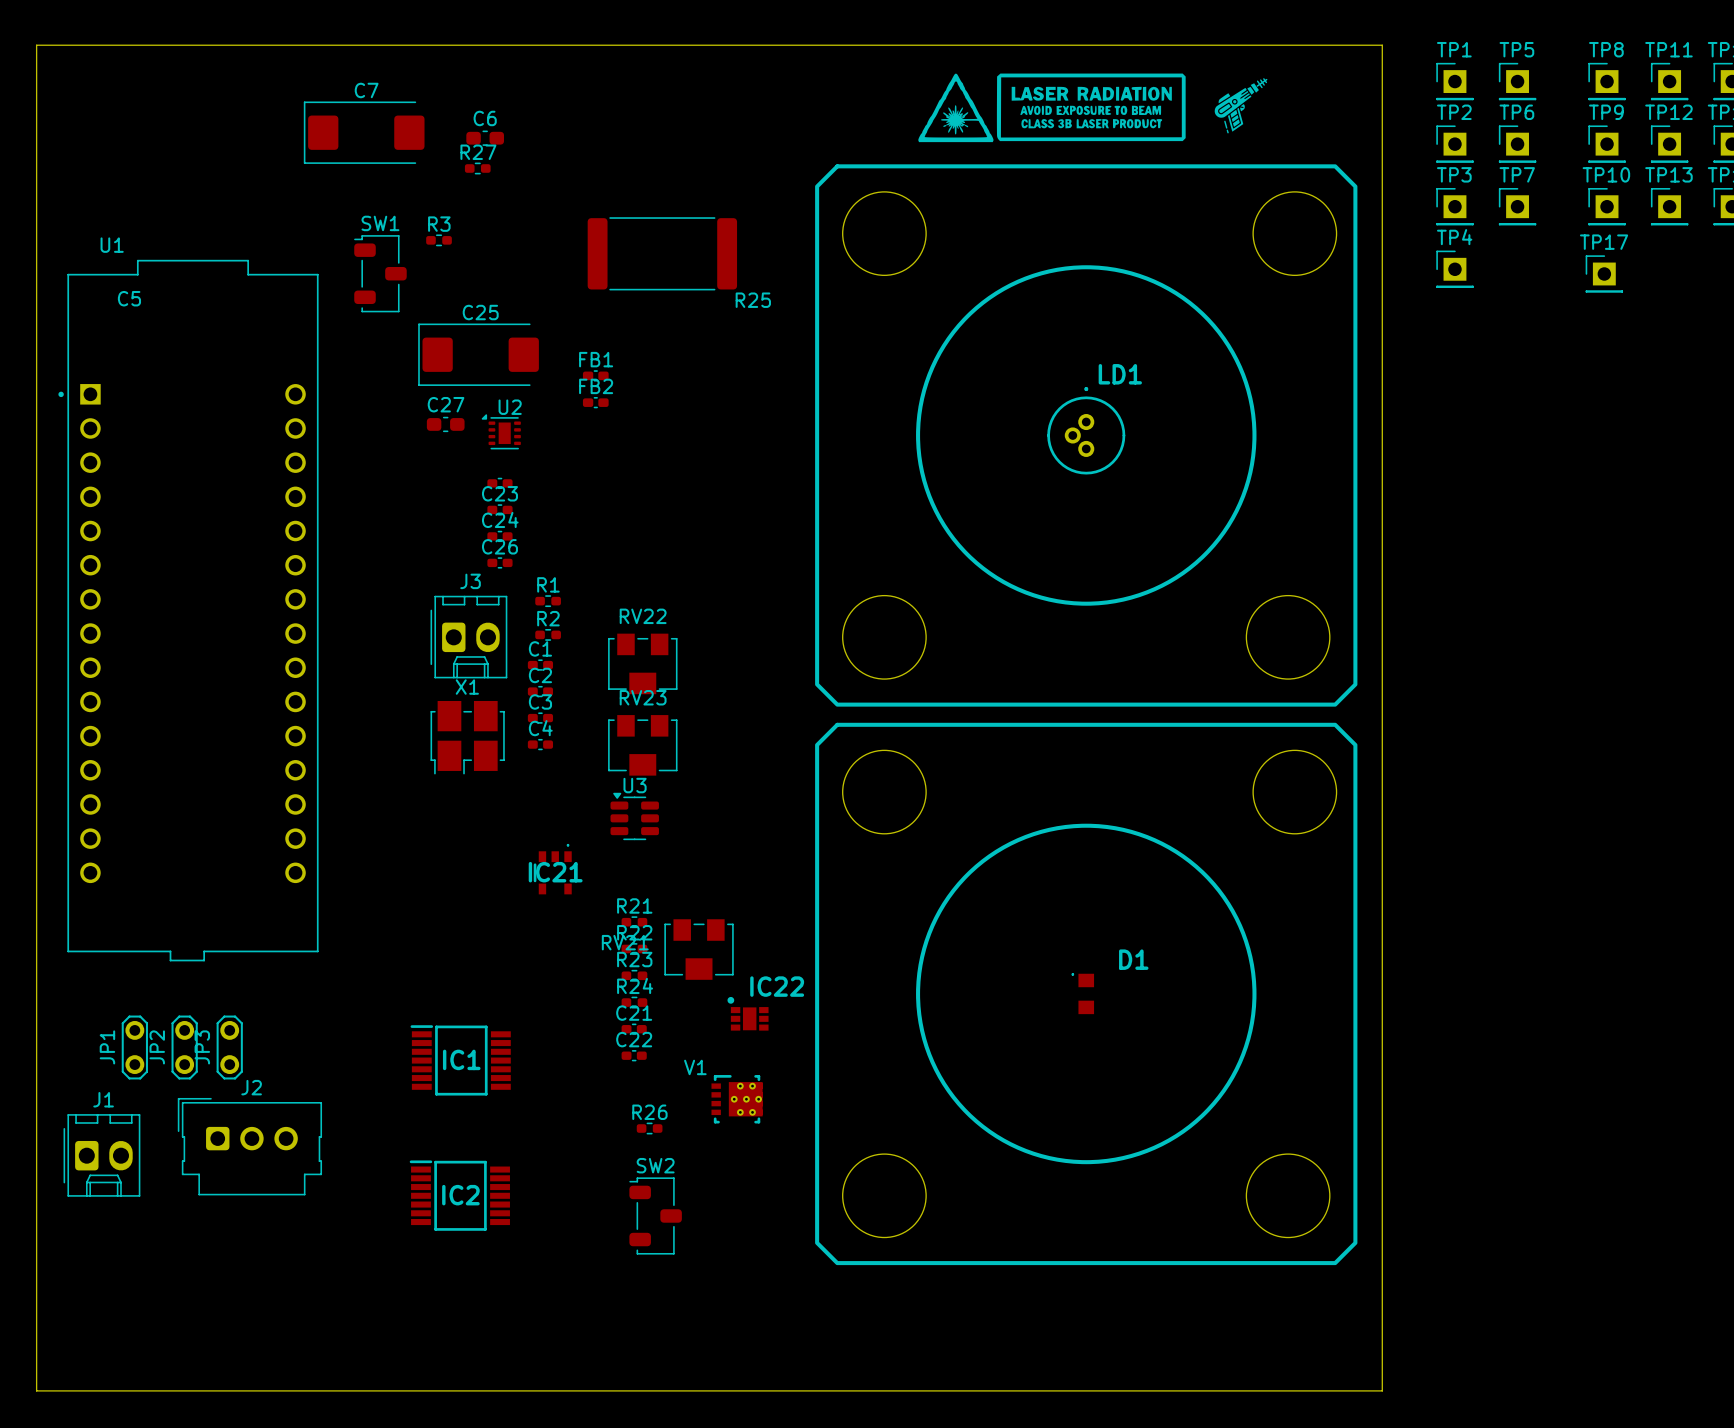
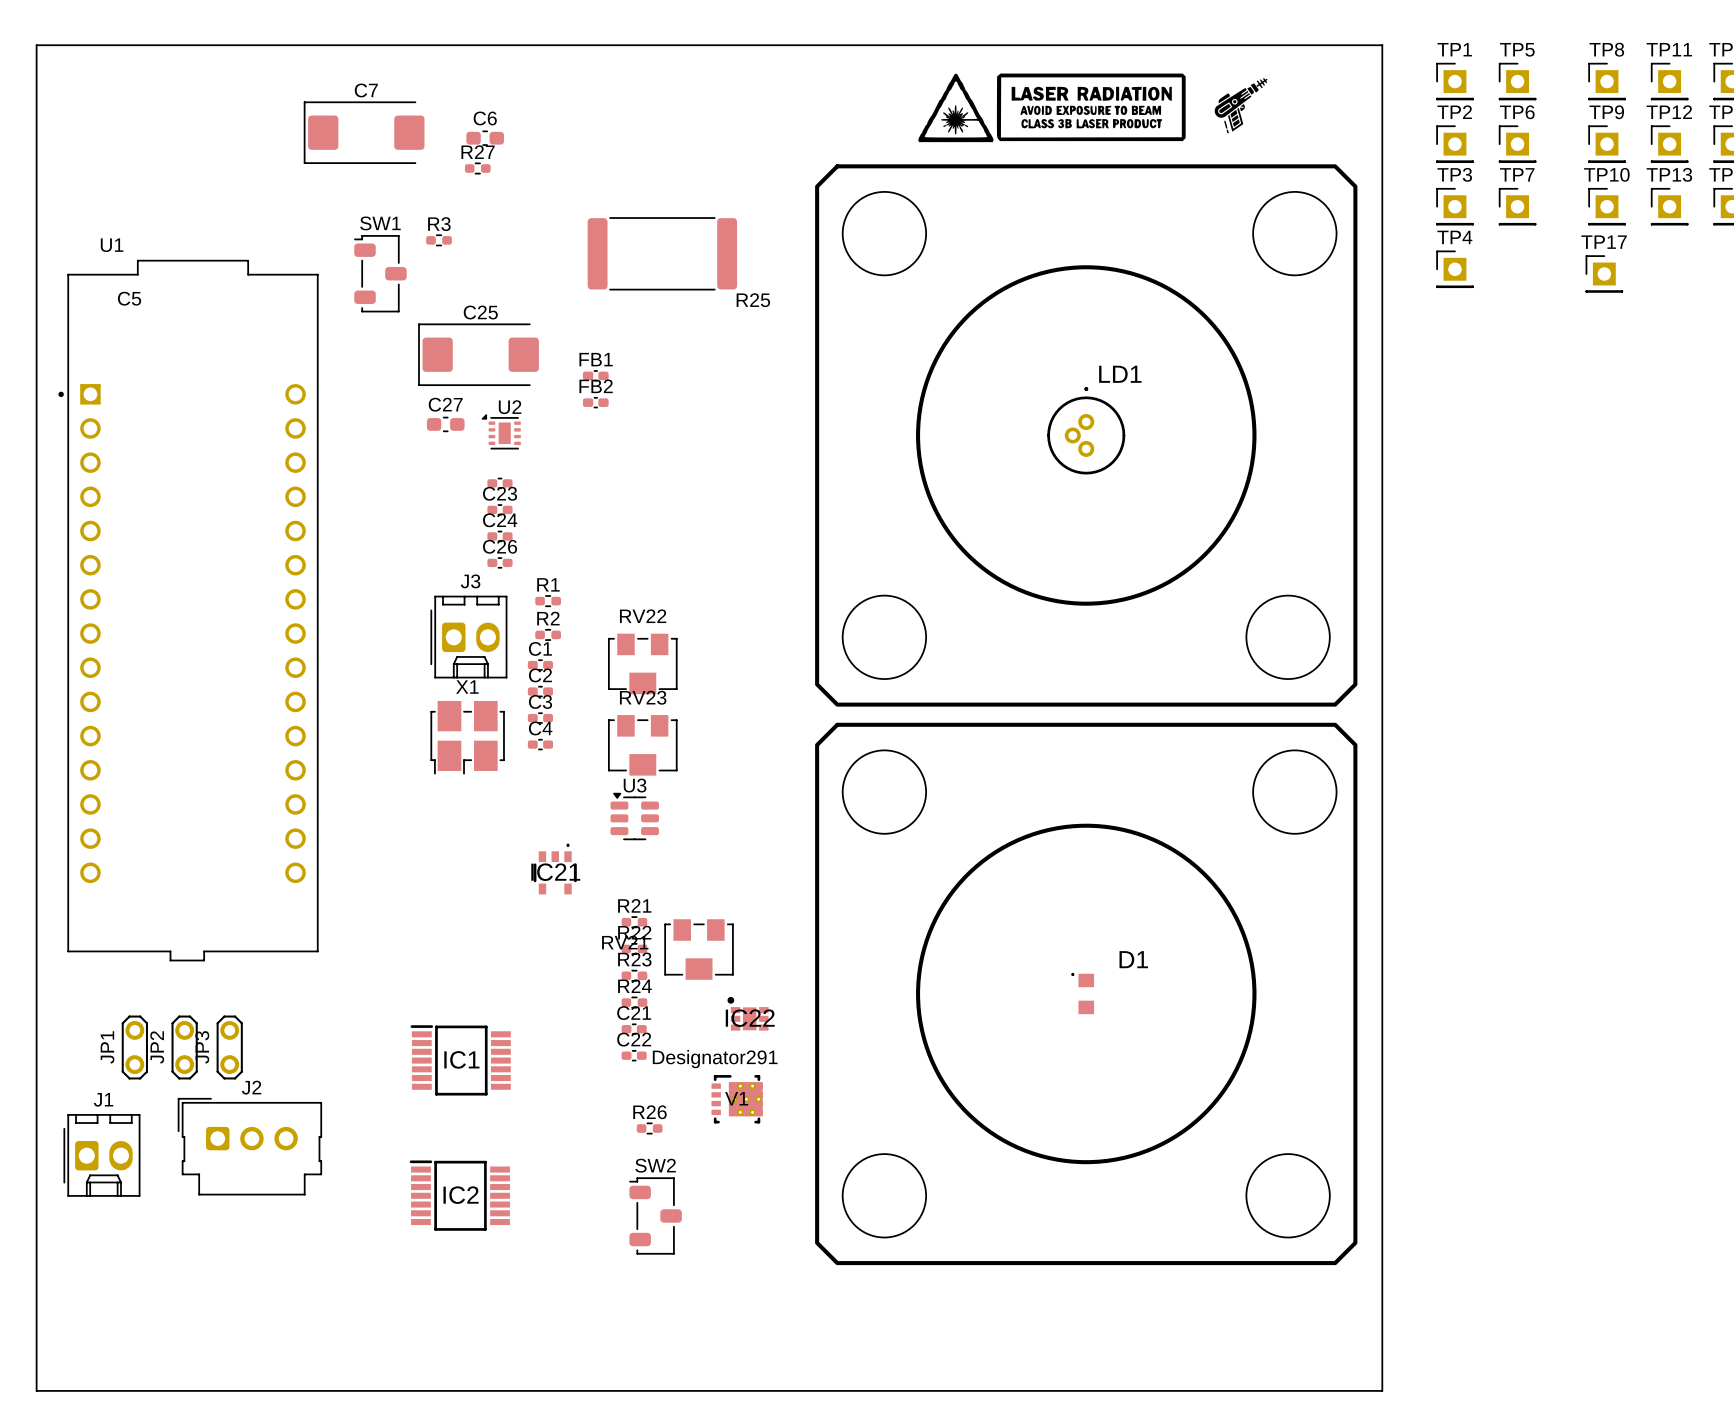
IC22 name position: IC22 (777, 986) -> IC22 (750, 1018)
V1 text: none -> Designator291 (715, 1059)
V1 name position: V1 (695, 1067) -> V1 (736, 1098)

